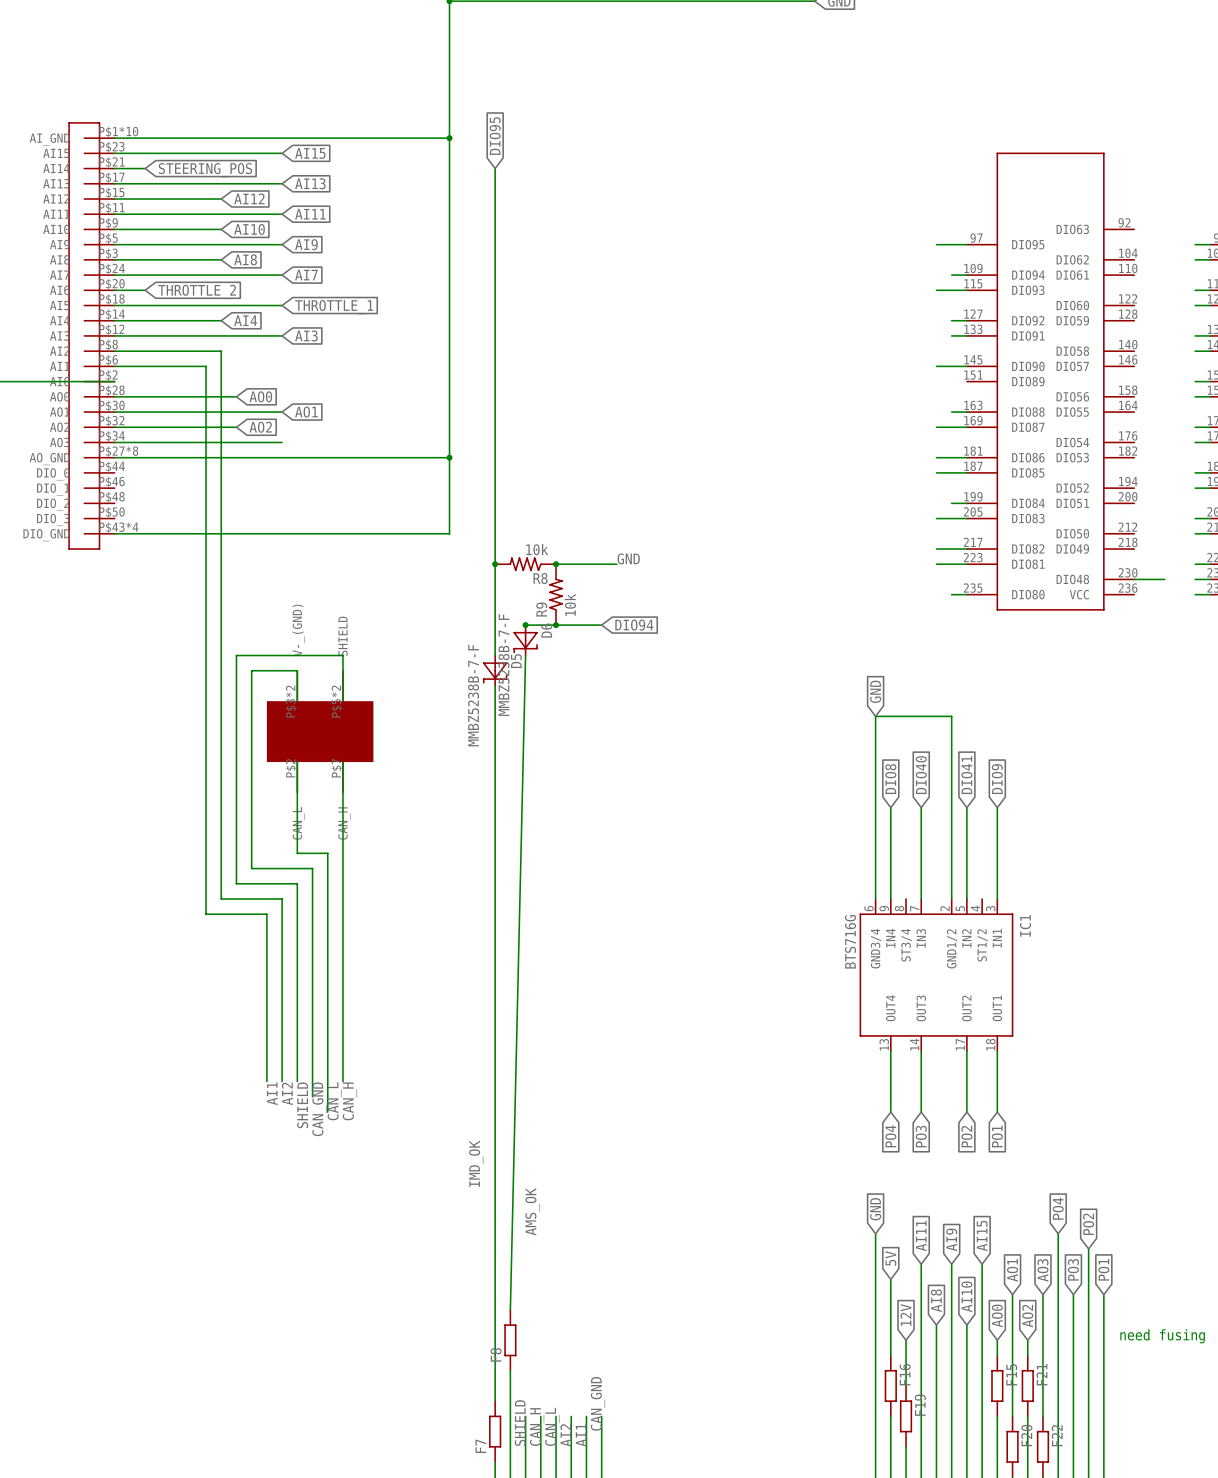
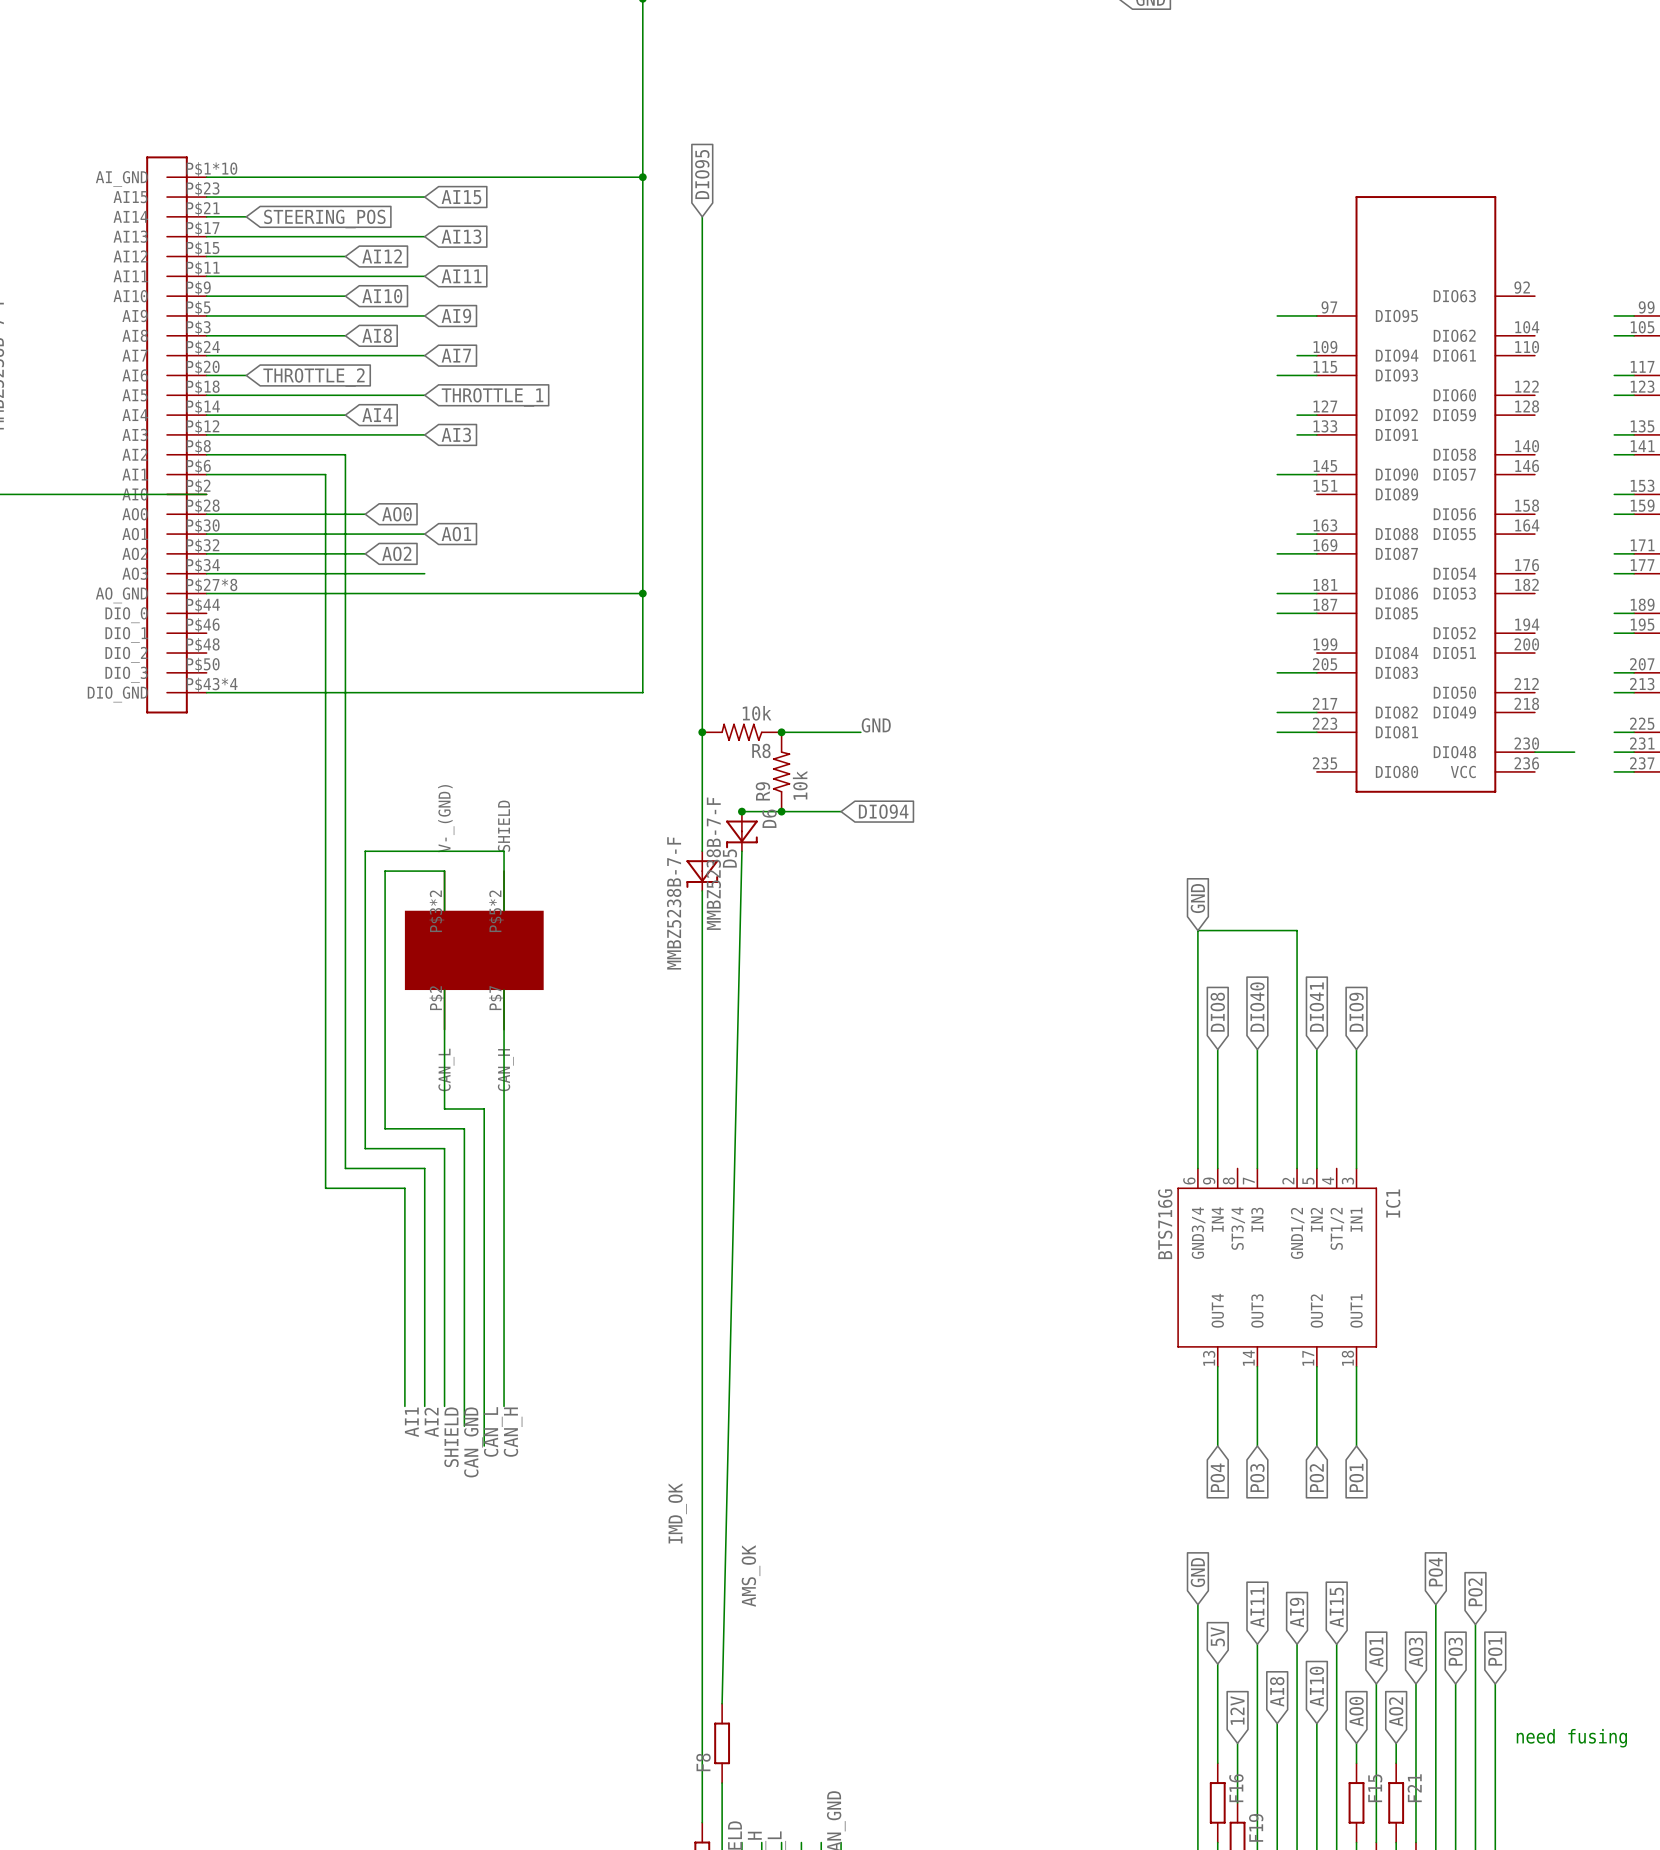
wire: (951, 503) (966, 503) -> none
wire: (951, 594) (966, 594) -> none

